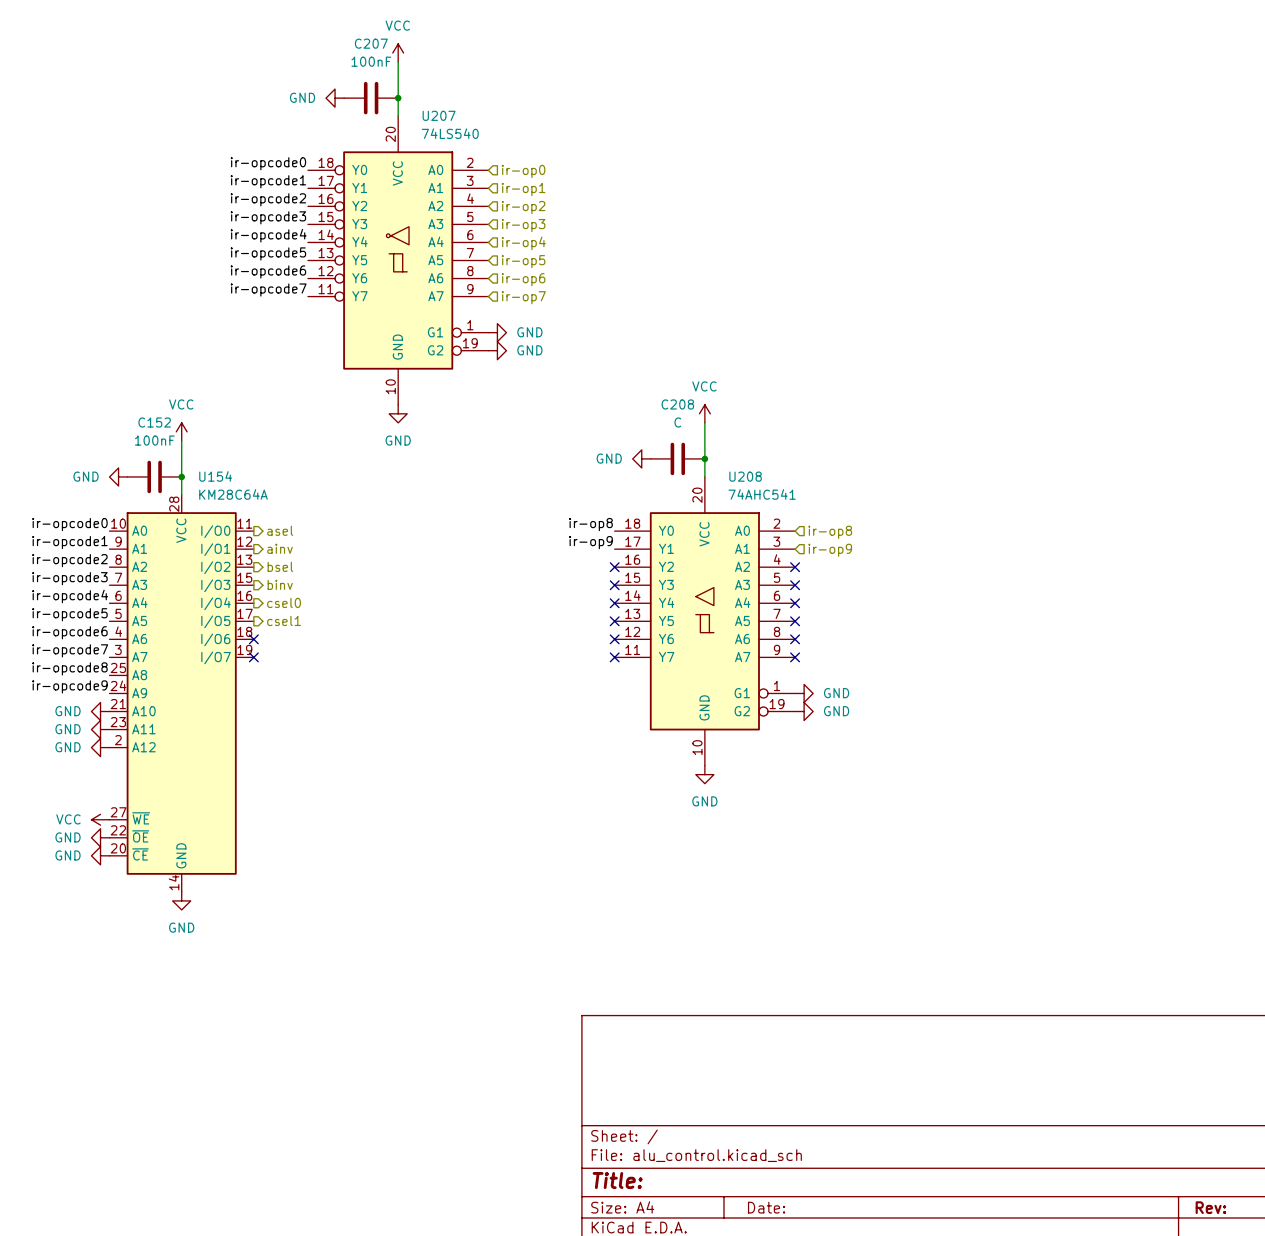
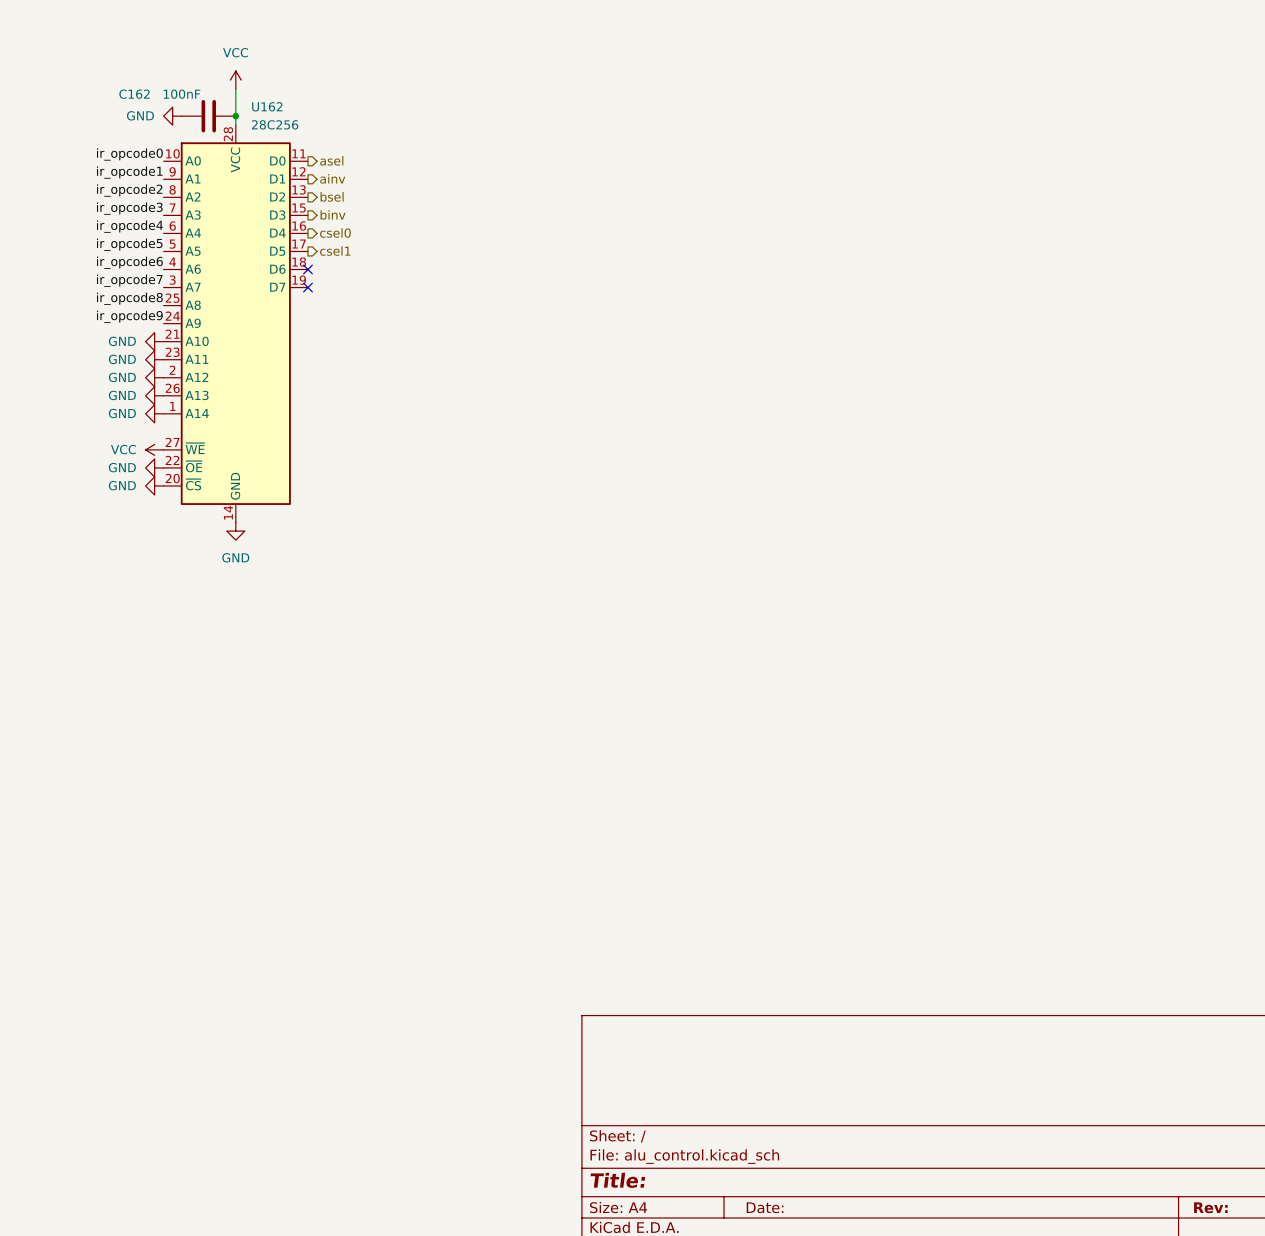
power symbol position: VCC (398, 53) -> VCC (235, 80)
wire: (398, 62) (398, 116) -> none
wire: none -> (235, 89) (235, 125)
power symbol: GND (335, 98) -> none
C207: 100nF (371, 98) -> none
junction: (398, 98) -> none
power symbol: none -> GND (172, 116)
C162: none -> 100nF (208, 116)
junction: none -> (235, 116)
label: none -> ir_opcode0 (129, 154)
hierarchical label: none -> asel (331, 160)
label: ir-opcode0 (268, 163) -> none
hierarchical label: ir-op0 (523, 171) -> none
label: none -> ir_opcode1 (129, 172)
hierarchical label: none -> ainv (332, 178)
label: ir-opcode1 (268, 181) -> none
hierarchical label: ir-op1 (523, 189) -> none
label: none -> ir_opcode2 (129, 190)
hierarchical label: none -> bsel (332, 196)
label: ir-opcode2 (268, 199) -> none
hierarchical label: ir-op2 (523, 207) -> none
label: none -> ir_opcode3 (129, 208)
hierarchical label: none -> binv (333, 214)
label: ir-opcode3 (268, 217) -> none
hierarchical label: ir-op3 (523, 225) -> none
label: none -> ir_opcode4 (129, 226)
hierarchical label: none -> csel0 (335, 232)
label: ir-opcode4 (268, 235) -> none
hierarchical label: ir-op4 (523, 243) -> none
label: none -> ir_opcode5 (129, 244)
hierarchical label: none -> csel1 (335, 251)
label: ir-opcode5 (268, 253) -> none
U207: 74LS540 (398, 260) -> none
hierarchical label: ir-op5 (523, 261) -> none
label: none -> ir_opcode6 (129, 262)
no-connect mark: none -> (307, 269)
label: ir-opcode6 (268, 271) -> none
hierarchical label: ir-op6 (523, 279) -> none
label: none -> ir_opcode7 (129, 280)
no-connect mark: none -> (307, 287)
label: ir-opcode7 (268, 290) -> none
hierarchical label: ir-op7 (523, 297) -> none
label: none -> ir_opcode8 (129, 298)
label: none -> ir_opcode9 (129, 316)
U162: none -> 28C256 (235, 323)
power symbol: GND (497, 332) -> none
power symbol: none -> GND (154, 341)
power symbol: GND (497, 350) -> none
power symbol: none -> GND (154, 359)
power symbol: none -> GND (154, 377)
power symbol: none -> GND (154, 395)
power symbol: none -> GND (154, 413)
power symbol: GND (398, 413) -> none
power symbol: VCC (704, 413) -> none
wire: (704, 422) (704, 476) -> none
power symbol rotation: 0° (181, 431) -> 90° counterclockwise (154, 449)
power symbol position: VCC (181, 431) -> VCC (154, 449)
power symbol: GND (641, 458) -> none
C208: C (677, 458) -> none
junction: (704, 458) -> none
power symbol: none -> GND (154, 467)
power symbol: GND (118, 476) -> none
C152: 100nF (154, 476) -> none
junction: (181, 476) -> none
power symbol: none -> GND (154, 486)
label: ir-opcode0 (69, 524) -> none
label: ir-op8 (590, 524) -> none
hierarchical label: asel (280, 530) -> none
power symbol: none -> GND (235, 531)
hierarchical label: ir-op8 (830, 532) -> none
label: ir-opcode1 (69, 542) -> none
label: ir-op9 (590, 542) -> none
hierarchical label: ainv (279, 548) -> none
hierarchical label: ir-op9 (830, 550) -> none
label: ir-opcode2 (69, 560) -> none
hierarchical label: bsel (280, 566) -> none
no-connect mark: (614, 567) -> none
no-connect mark: (795, 567) -> none
label: ir-opcode3 (69, 578) -> none
hierarchical label: binv (280, 584) -> none
no-connect mark: (614, 585) -> none
no-connect mark: (795, 585) -> none
label: ir-opcode4 (70, 596) -> none
hierarchical label: csel0 (284, 602) -> none
no-connect mark: (614, 603) -> none
no-connect mark: (795, 603) -> none
label: ir-opcode5 (69, 614) -> none
hierarchical label: csel1 (284, 620) -> none
no-connect mark: (614, 621) -> none
U208: 74AHC541 (704, 621) -> none
no-connect mark: (795, 621) -> none
label: ir-opcode6 (69, 632) -> none
no-connect mark: (253, 639) -> none
no-connect mark: (614, 639) -> none
no-connect mark: (795, 639) -> none
label: ir-opcode7 (70, 650) -> none
no-connect mark: (253, 657) -> none
no-connect mark: (614, 657) -> none
no-connect mark: (795, 657) -> none
label: ir-opcode8 (69, 668) -> none
label: ir-opcode9 (69, 686) -> none
U154: KM28C64A (181, 693) -> none
power symbol: GND (804, 693) -> none
power symbol: GND (100, 711) -> none
power symbol: GND (804, 711) -> none
power symbol: GND (100, 729) -> none
power symbol: GND (100, 747) -> none
power symbol: GND (704, 774) -> none
power symbol: VCC (100, 819) -> none
power symbol: GND (100, 837) -> none
power symbol: GND (100, 855) -> none
power symbol: GND (181, 900) -> none

